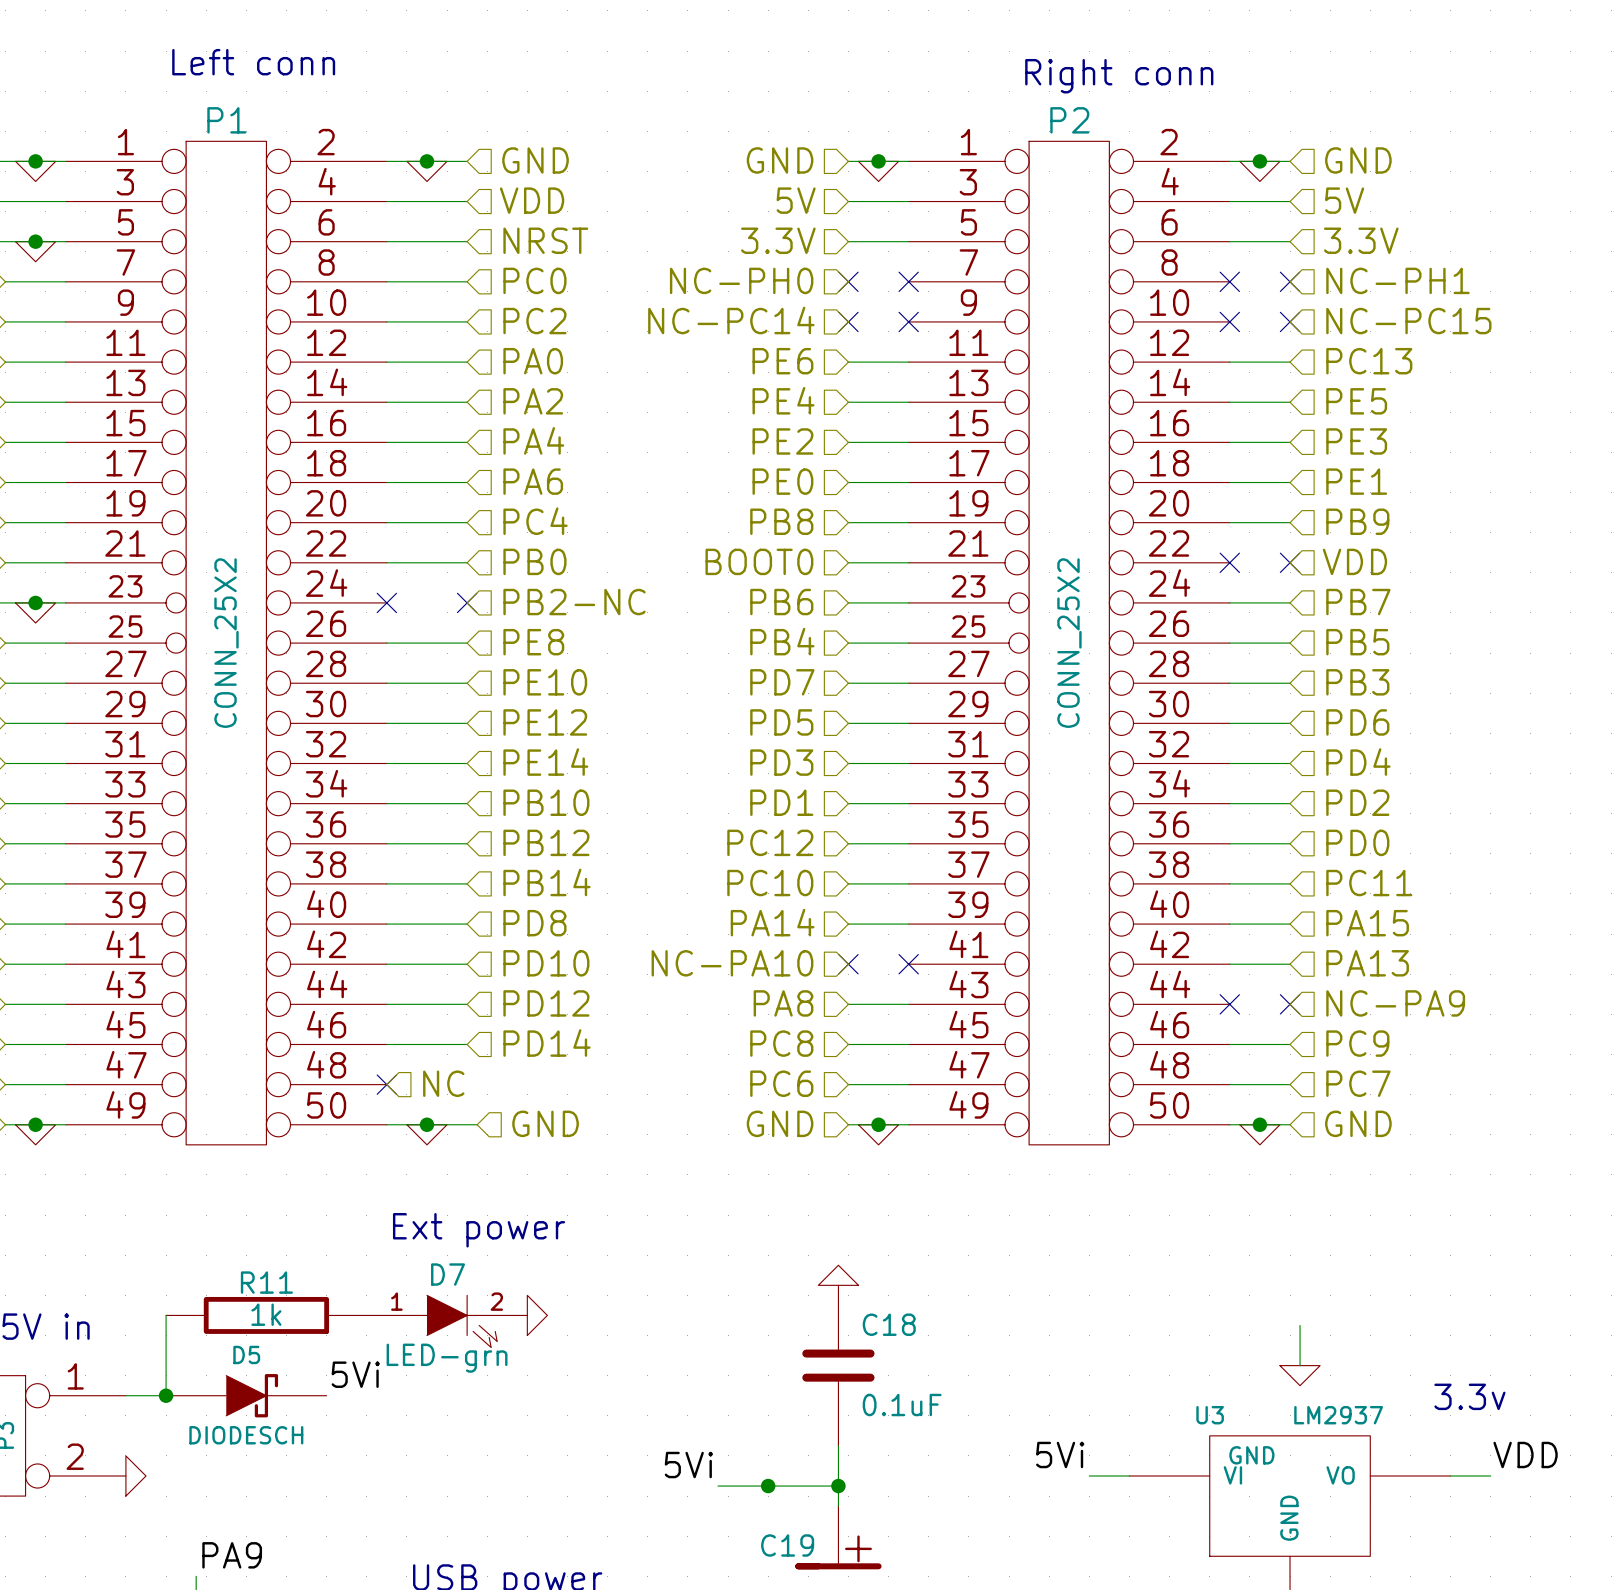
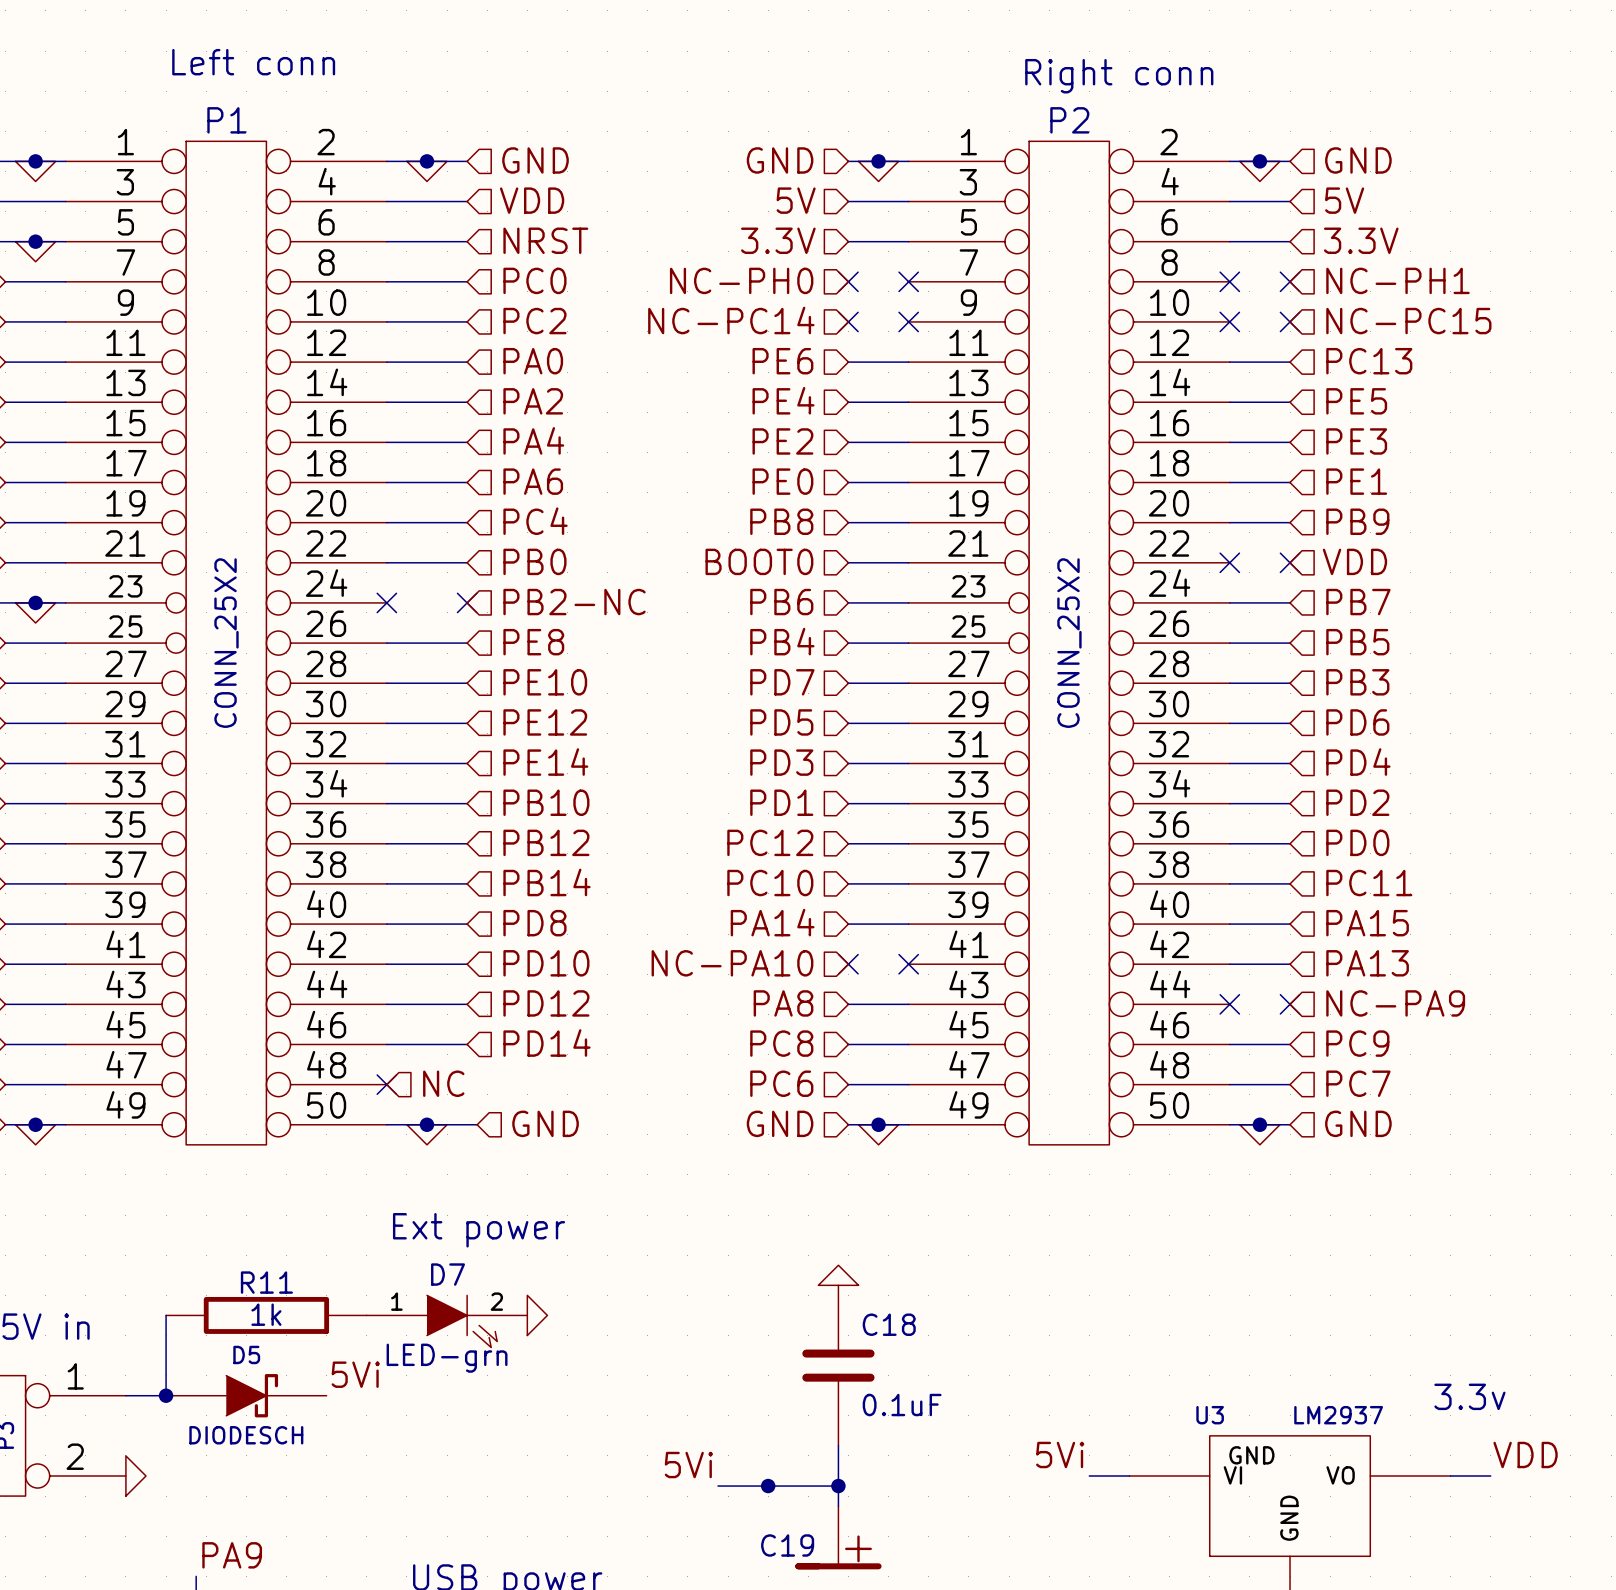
wire: (1300, 1325) (1300, 1365) -> none
power symbol: (1300, 1375) -> none

